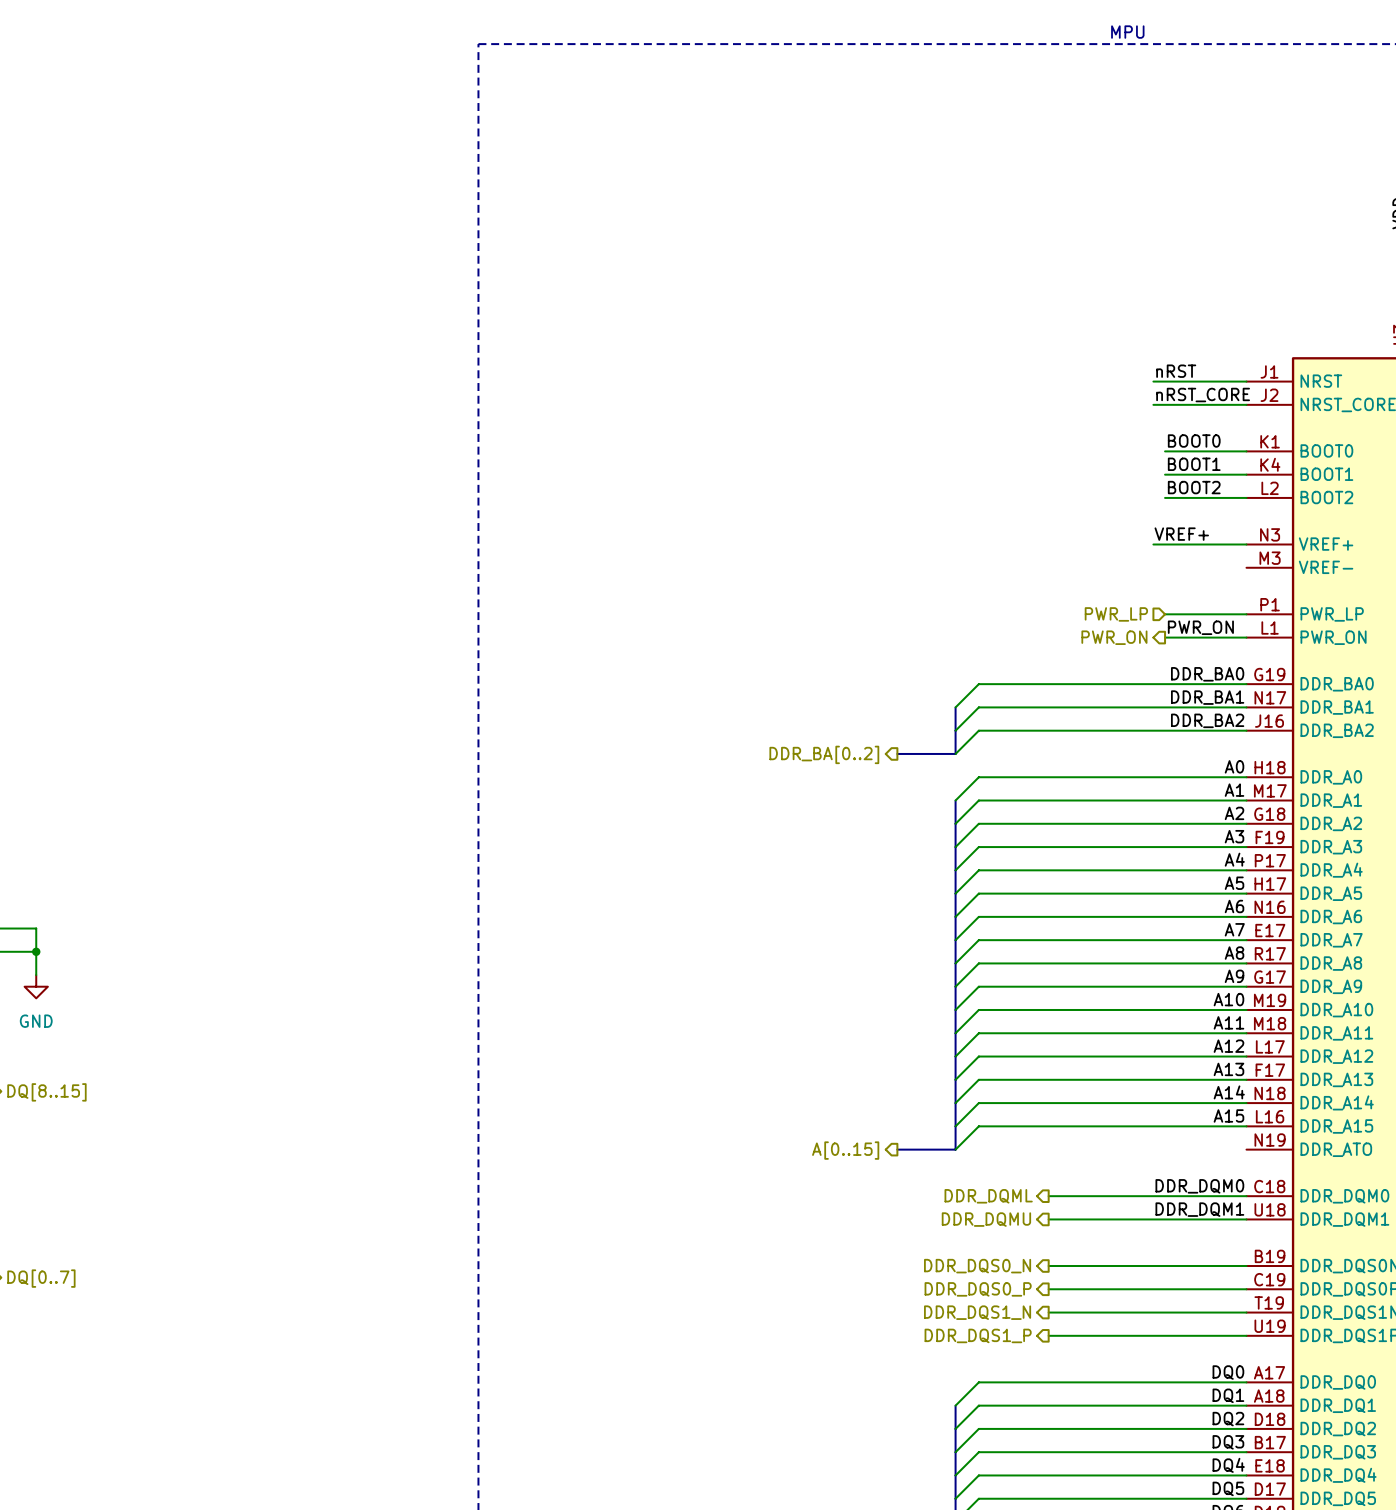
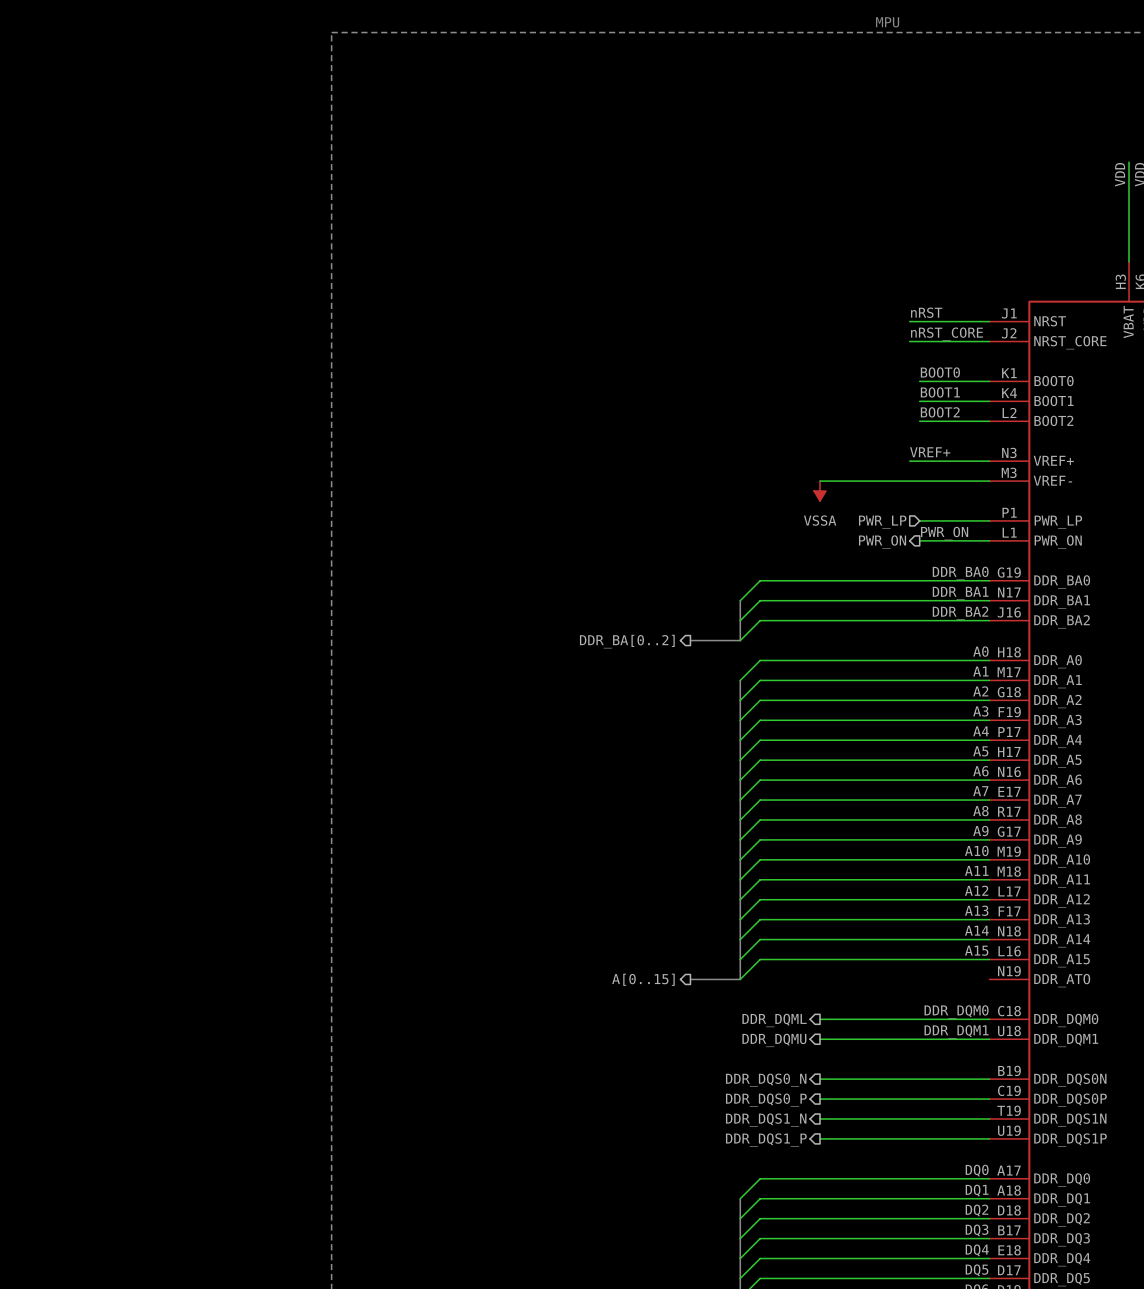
wire: none -> (820, 481) (989, 481)
power symbol: none -> VSSA (820, 491)

